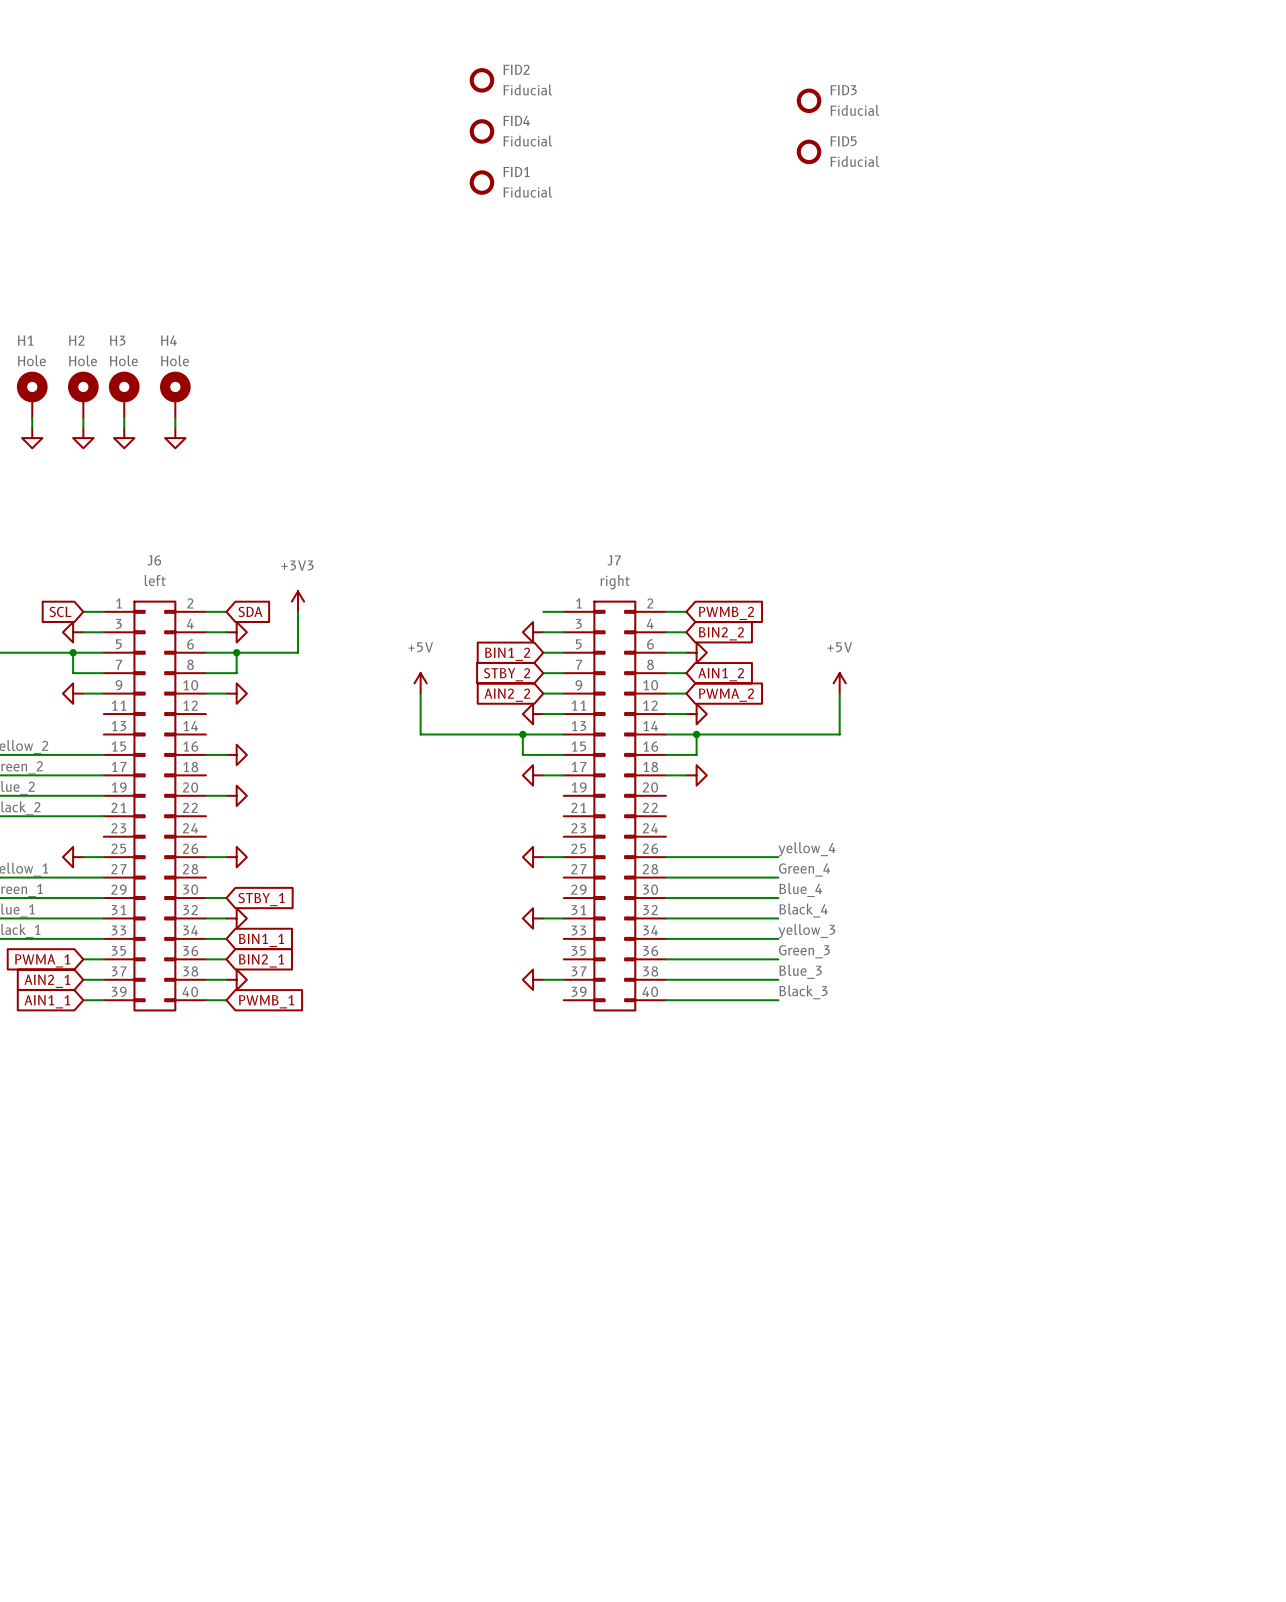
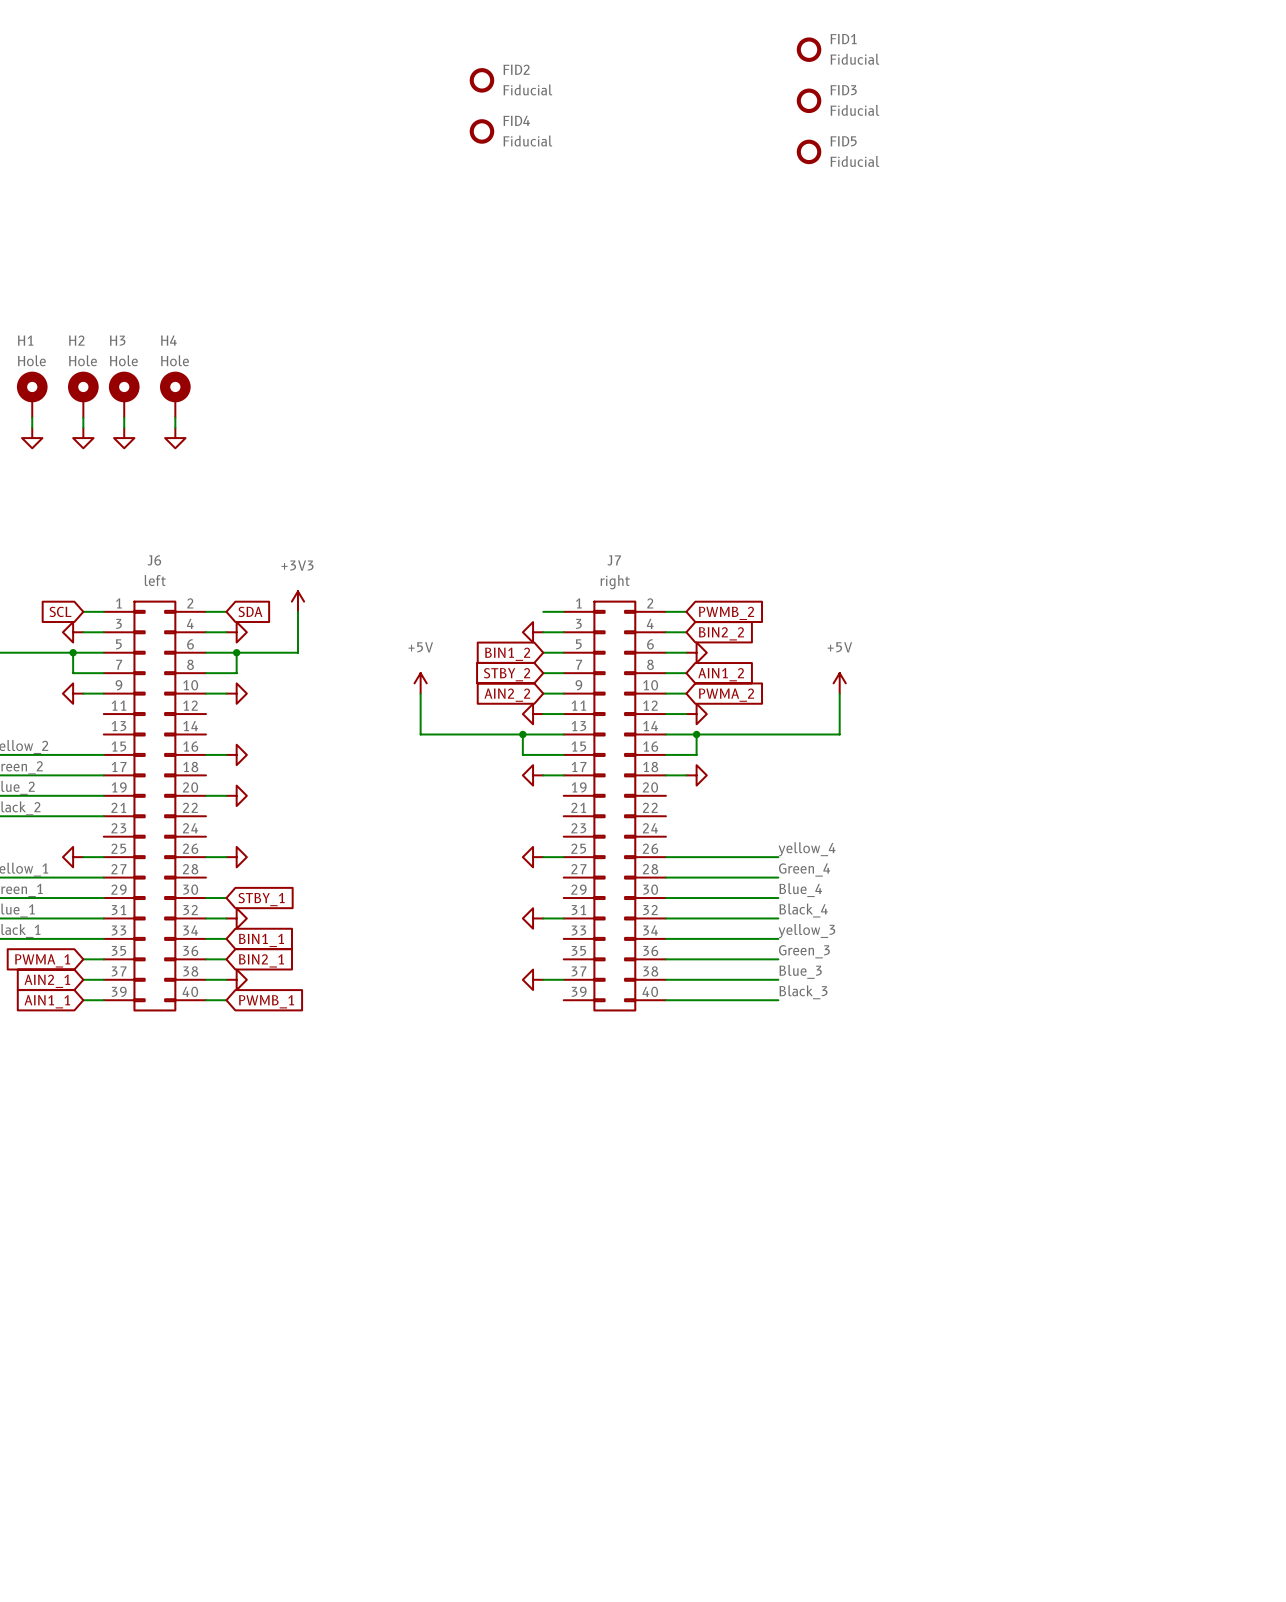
FID1 position: (481, 182) -> (809, 49)

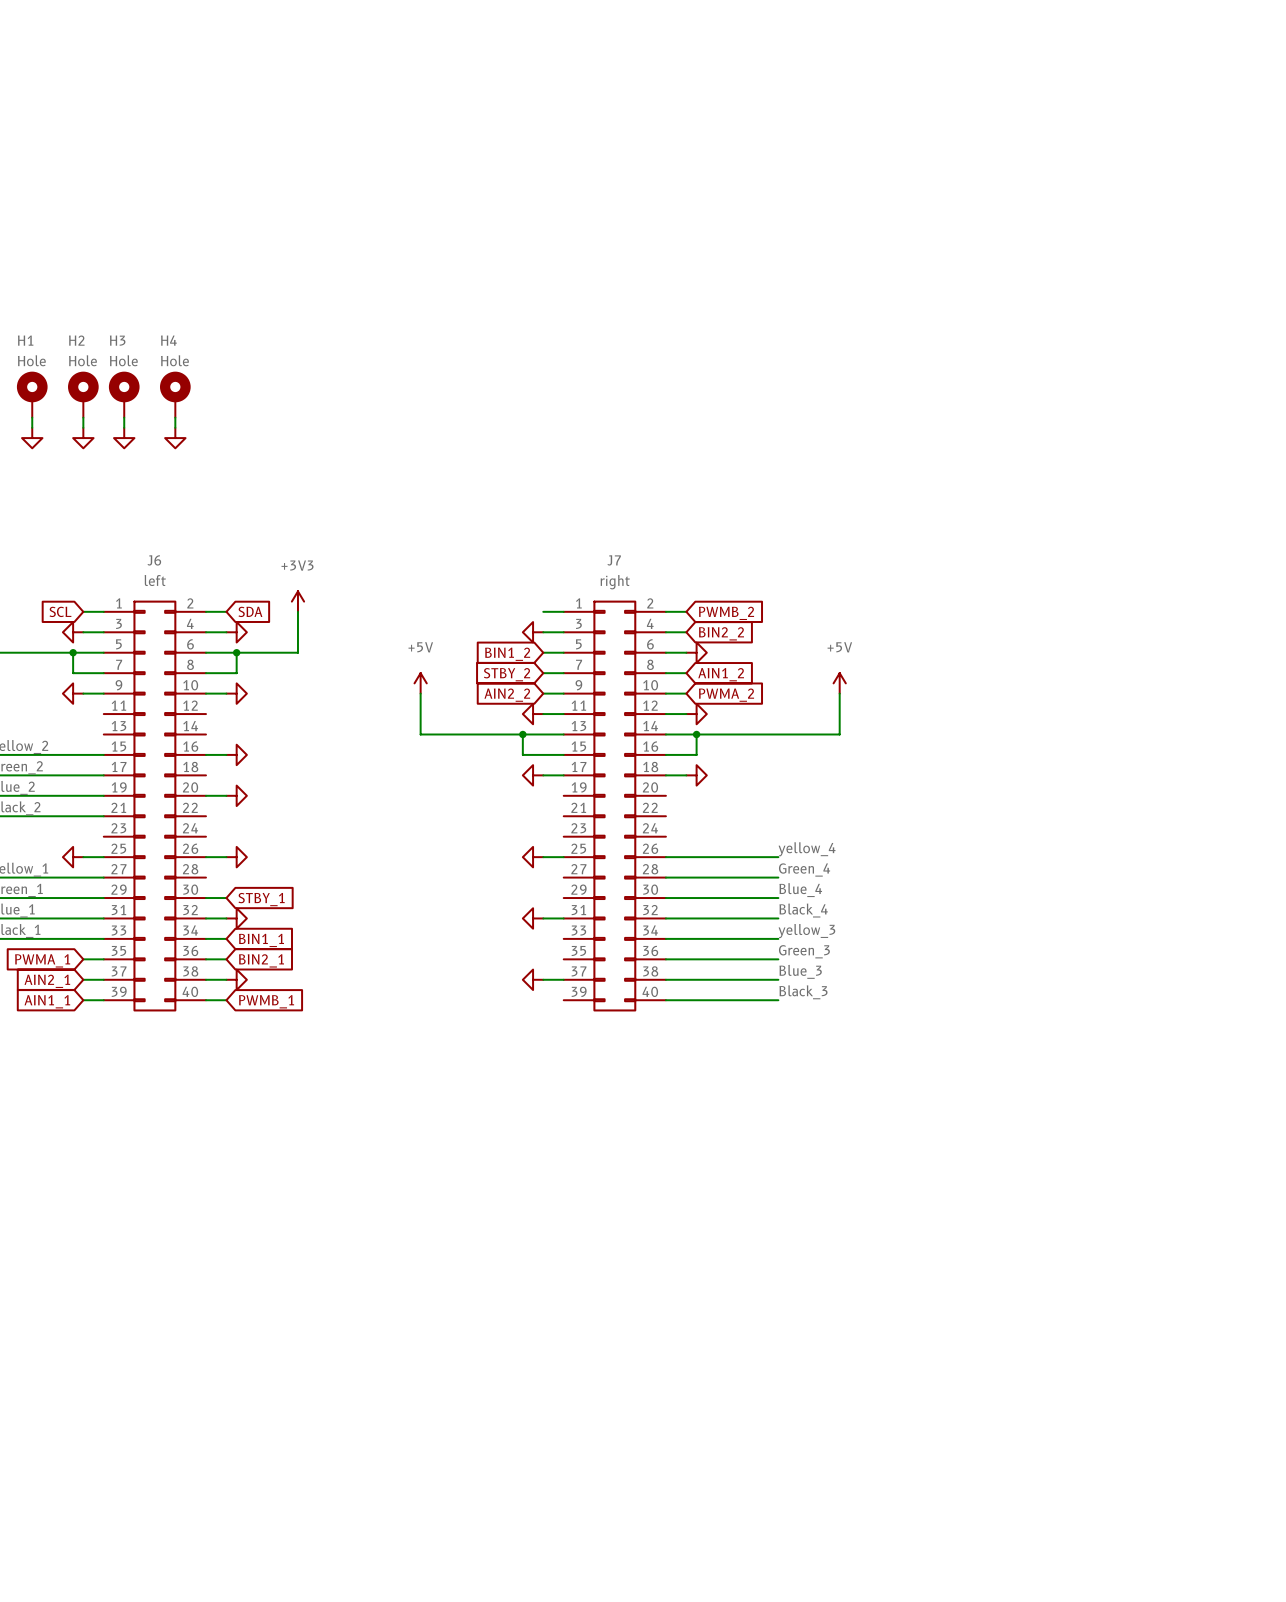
FID1: Fiducial (809, 49) -> none
FID2: Fiducial (481, 80) -> none
FID3: Fiducial (809, 100) -> none
FID4: Fiducial (481, 131) -> none
FID5: Fiducial (809, 151) -> none

